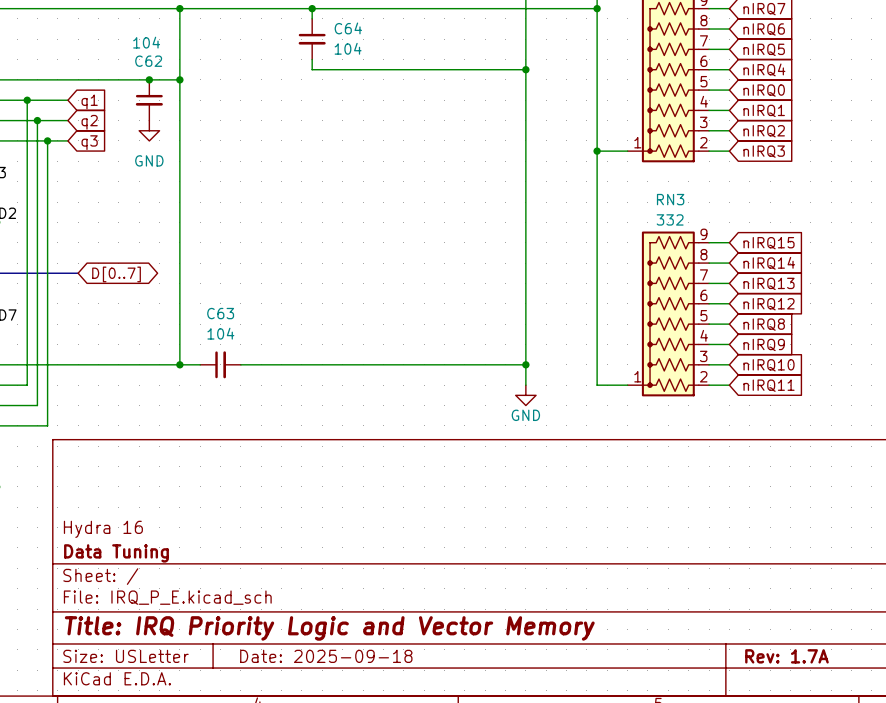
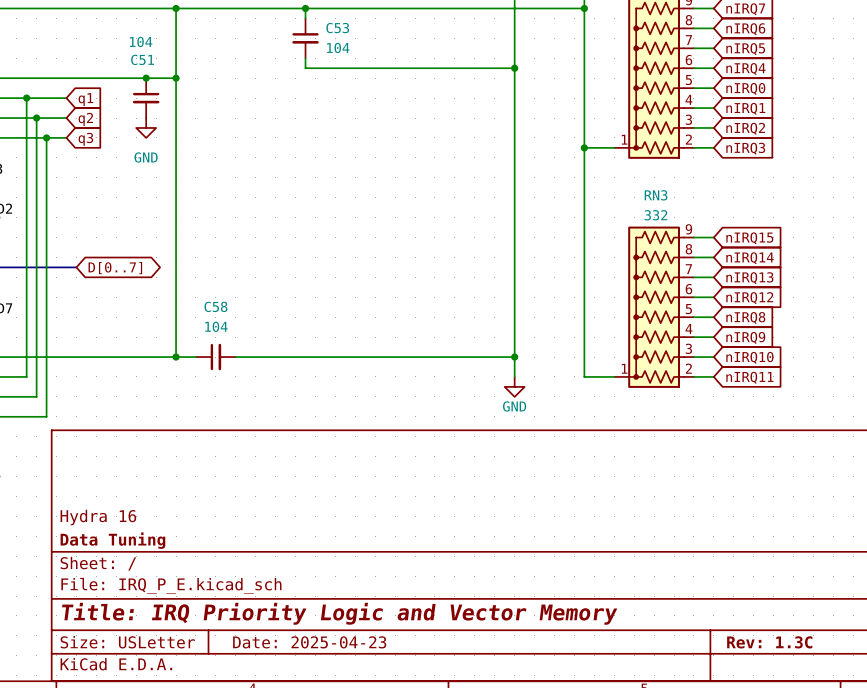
C64 name: C64 (348, 28) -> C53 (337, 28)
C62 name: C62 (148, 61) -> C51 (142, 59)
C63 name: C63 (220, 313) -> C58 (215, 306)
title block: Date: 2025-09-18 (326, 656) -> Date: 2025-04-23 (309, 642)
title block: Rev: 1.7A (786, 656) -> Rev: 1.3C (769, 642)

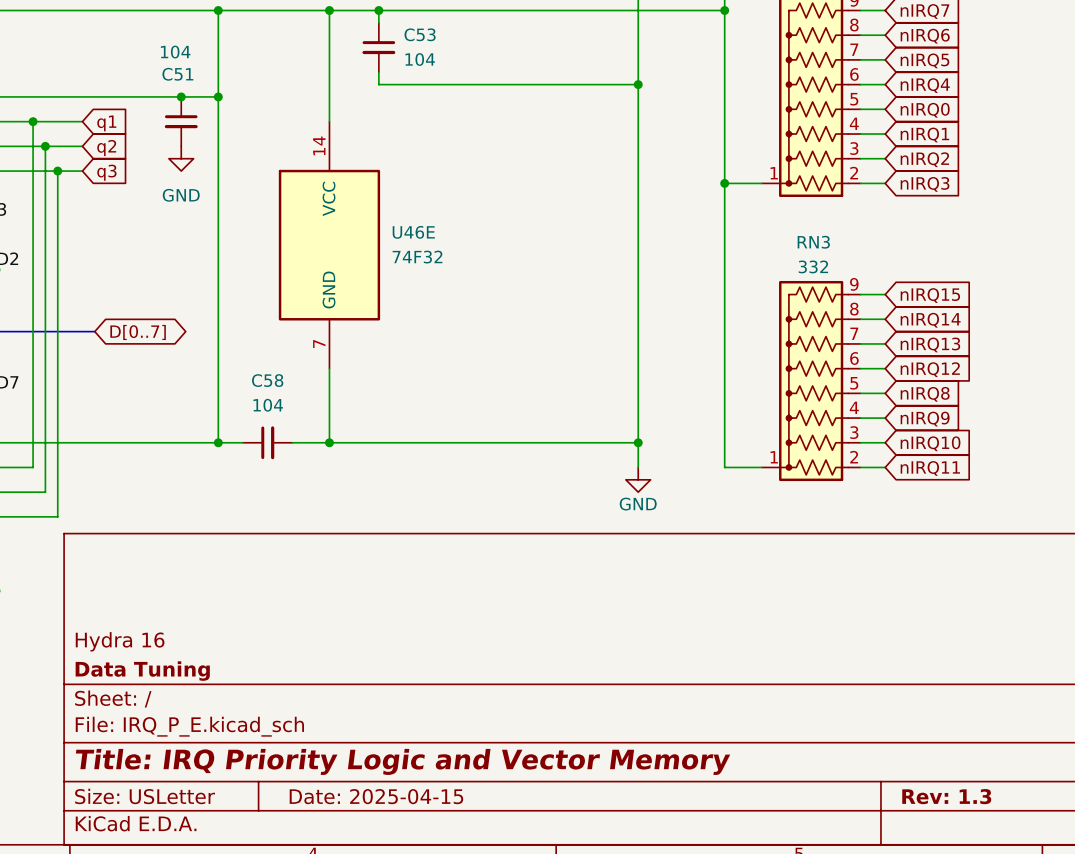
wire: none -> (329, 10) (329, 121)
junction: none -> (329, 10)
U46E: none -> 74F32 (329, 245)
wire: none -> (329, 368) (329, 442)
junction: none -> (329, 442)
title block: Date: 2025-04-23 (309, 642) -> Date: 2025-04-15 (376, 796)
title block: Rev: 1.3C (769, 642) -> Rev: 1.3 (946, 796)

